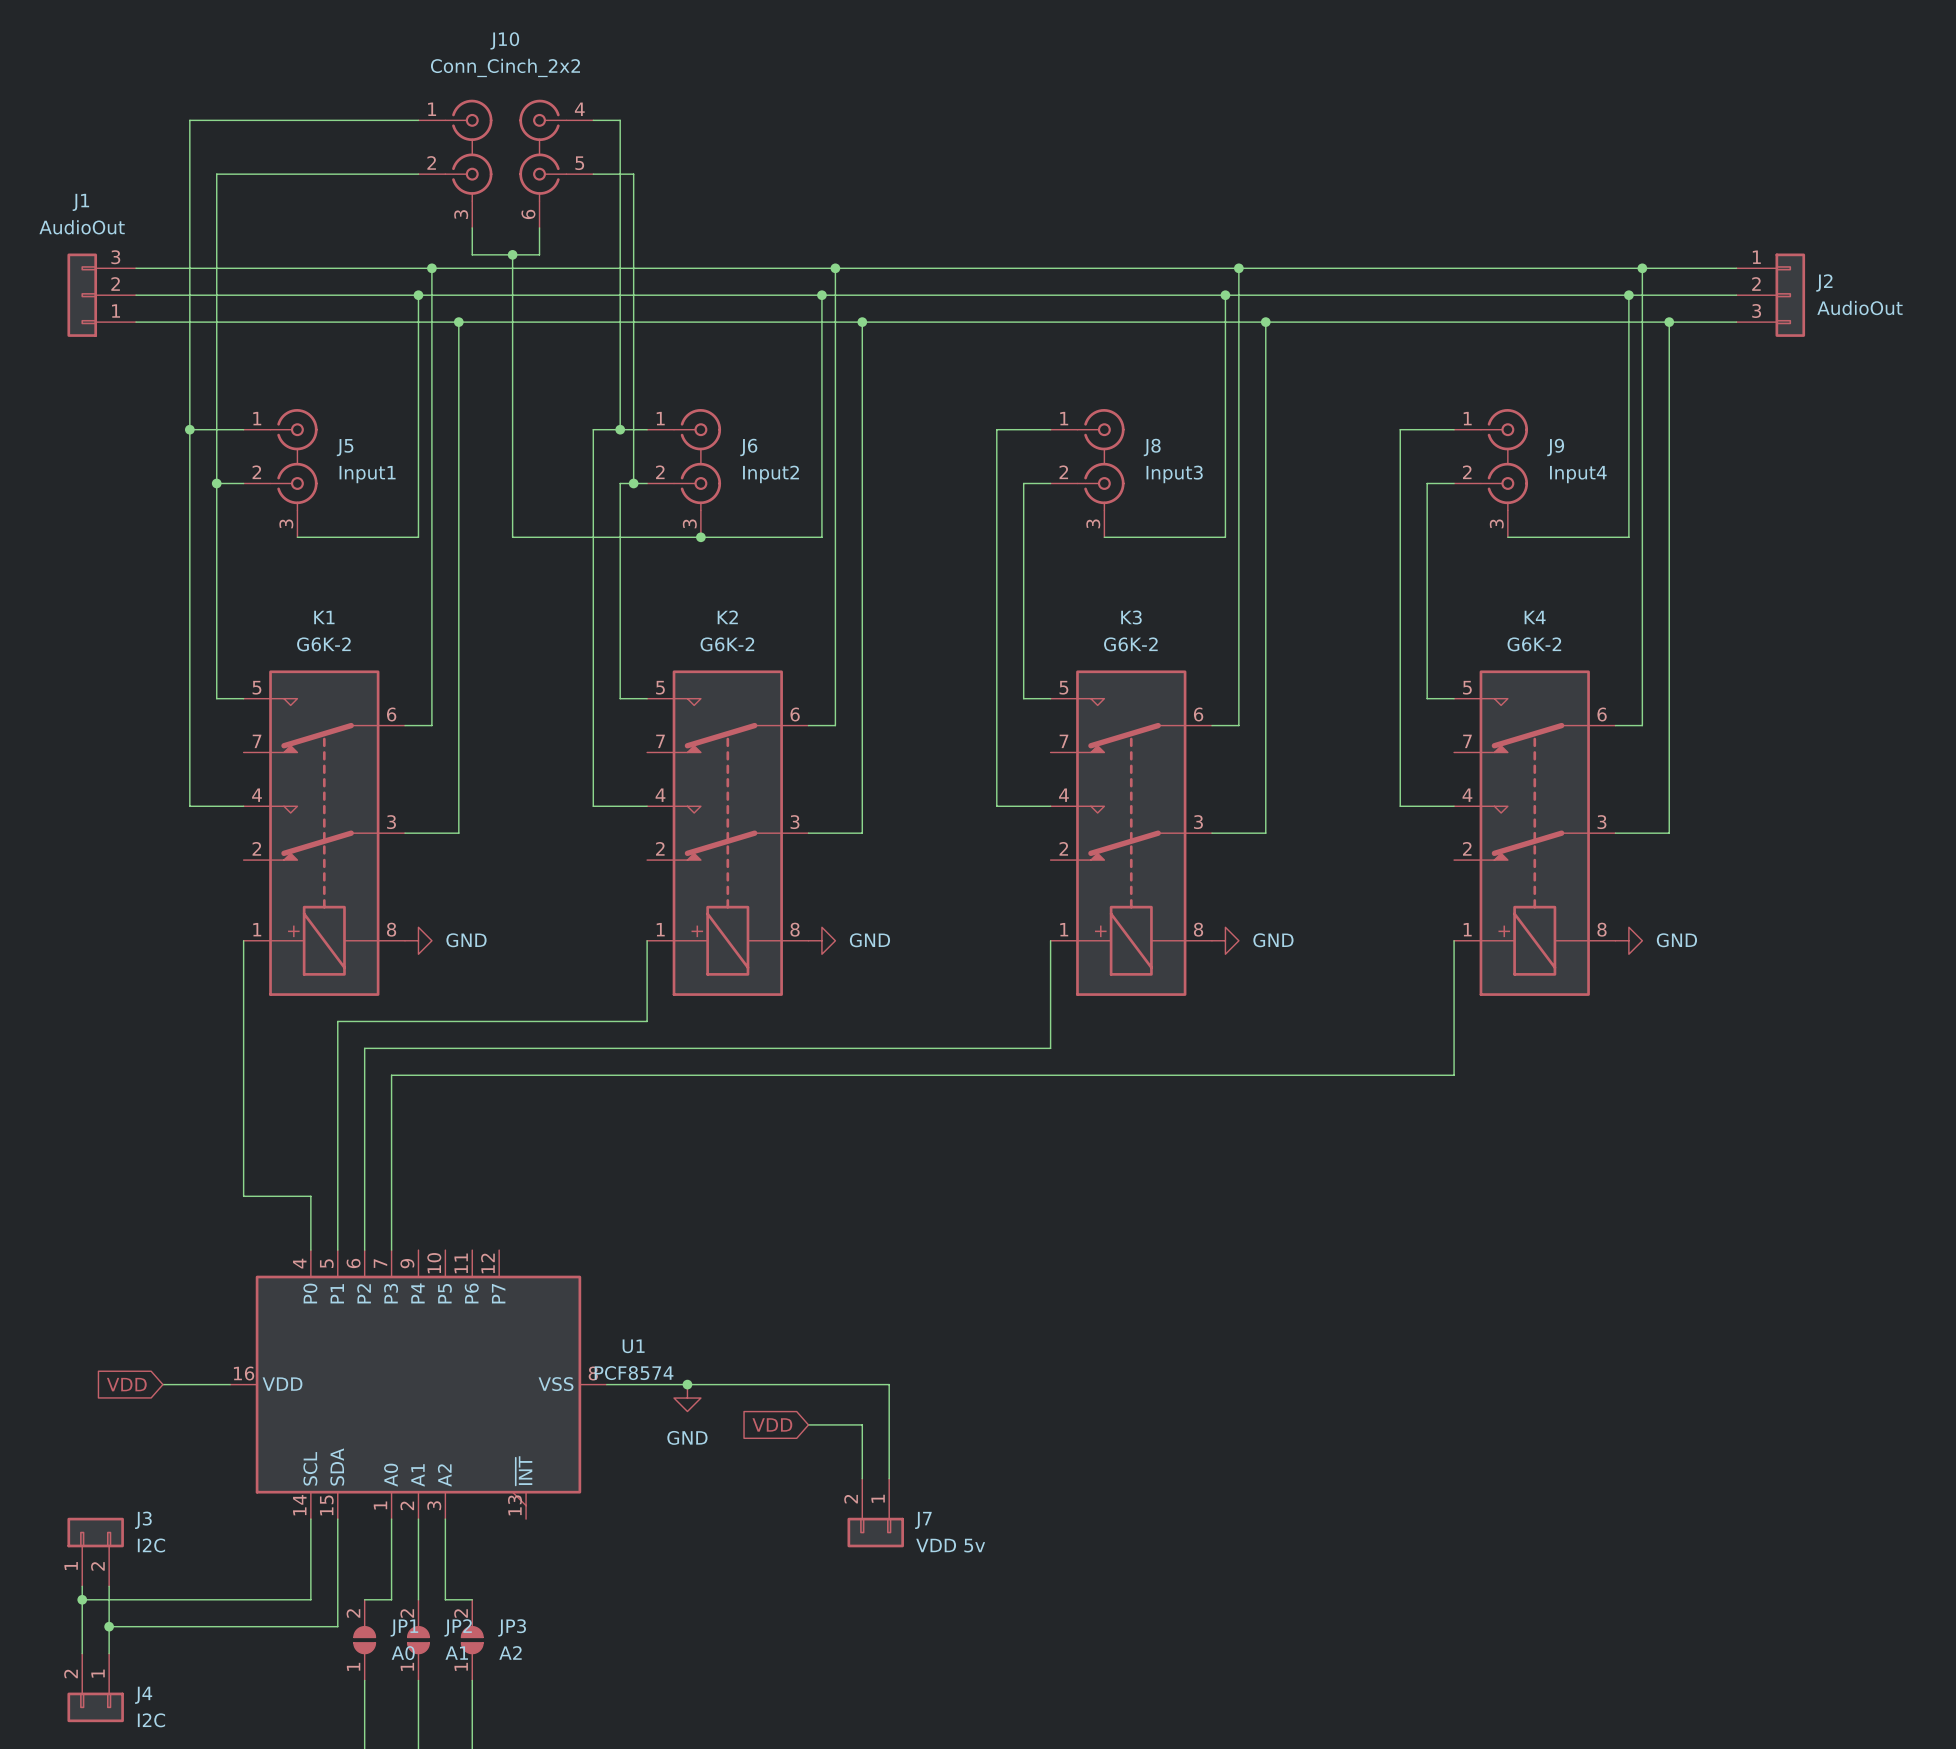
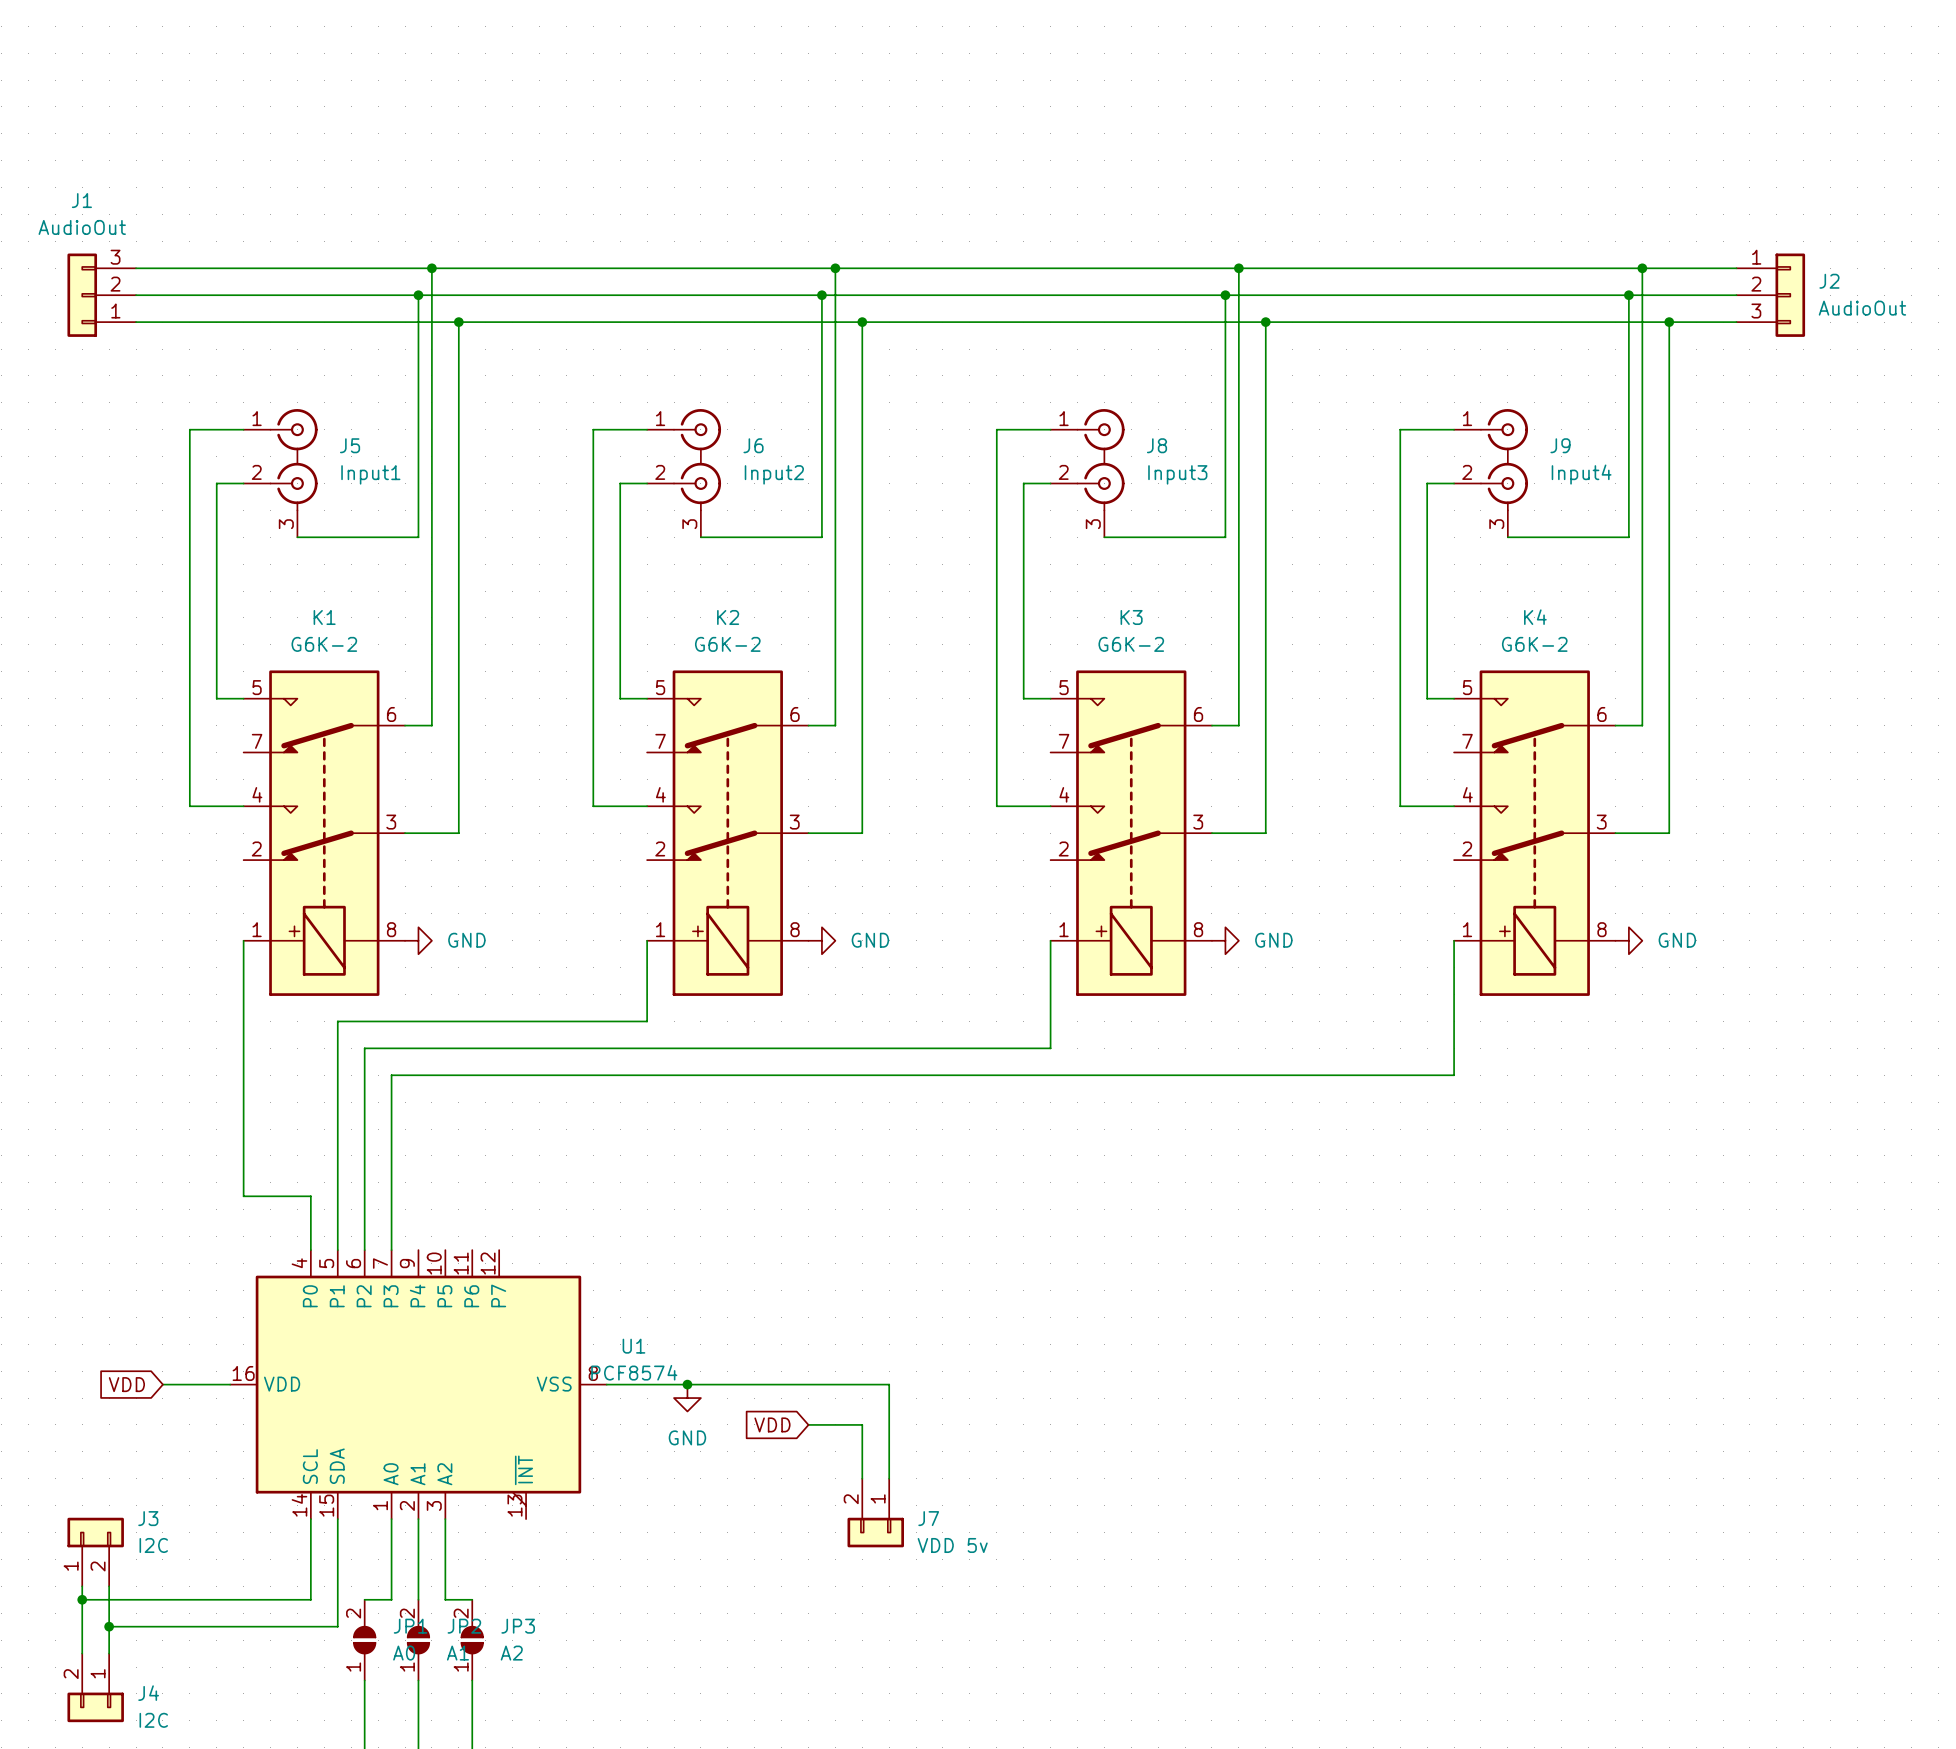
wire: (418, 120) (189, 120) (189, 429) -> none
wire: (593, 120) (620, 120) (620, 429) -> none
J10: Conn_Cinch_2x2 (505, 163) -> none
wire: (418, 174) (216, 174) (216, 483) -> none
wire: (593, 174) (633, 174) (633, 483) -> none
wire: (472, 227) (472, 254) (539, 254) (539, 227) -> none
wire: (512, 254) (512, 537) (700, 537) -> none
junction: (512, 254) -> none
junction: (189, 429) -> none
junction: (620, 429) -> none
junction: (216, 483) -> none
junction: (633, 483) -> none
junction: (700, 537) -> none

